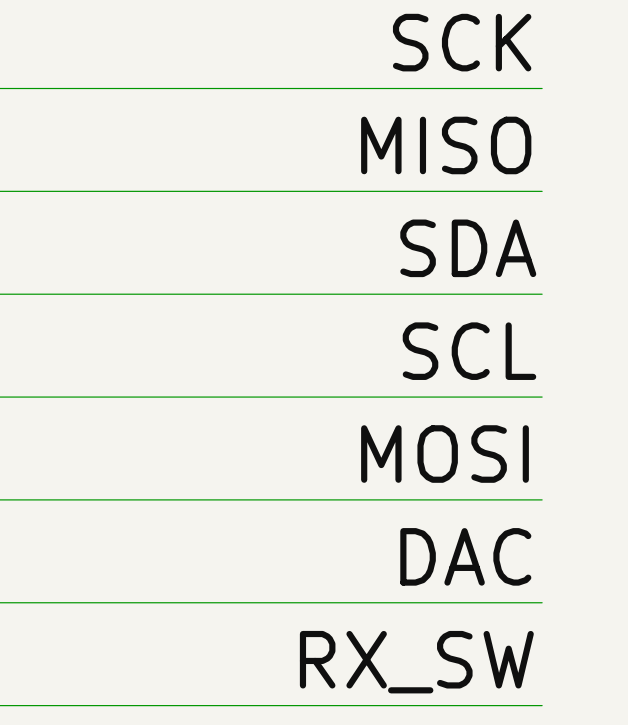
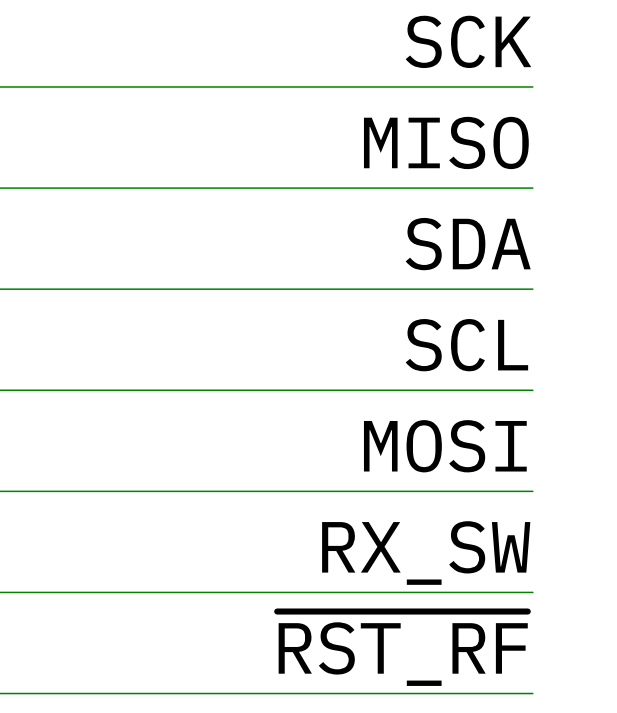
label: DAC (465, 556) -> RX_SW (426, 553)
label: RX_SW (416, 662) -> ~{RST_RF} (402, 648)

